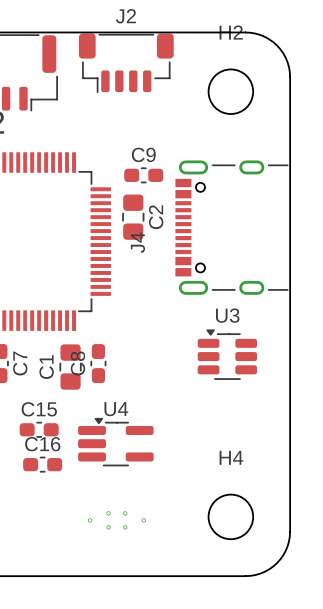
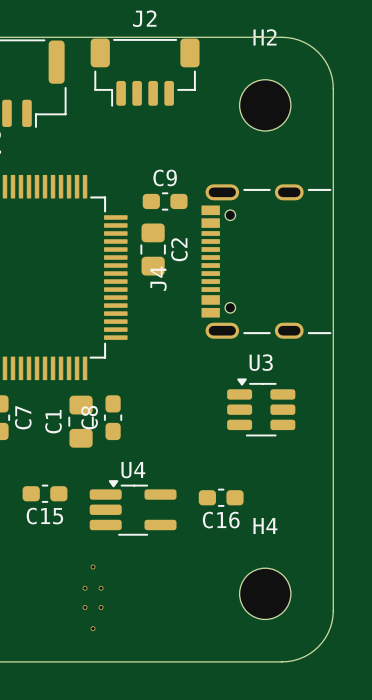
C15 name position: C15 (39, 409) -> C15 (44, 516)
C16 name position: C16 (42, 444) -> C16 (221, 520)
C16 position: (42, 464) -> (221, 497)
part rotation: 0° (116, 520) -> 90° clockwise (93, 597)
part position: (116, 520) -> (93, 597)

